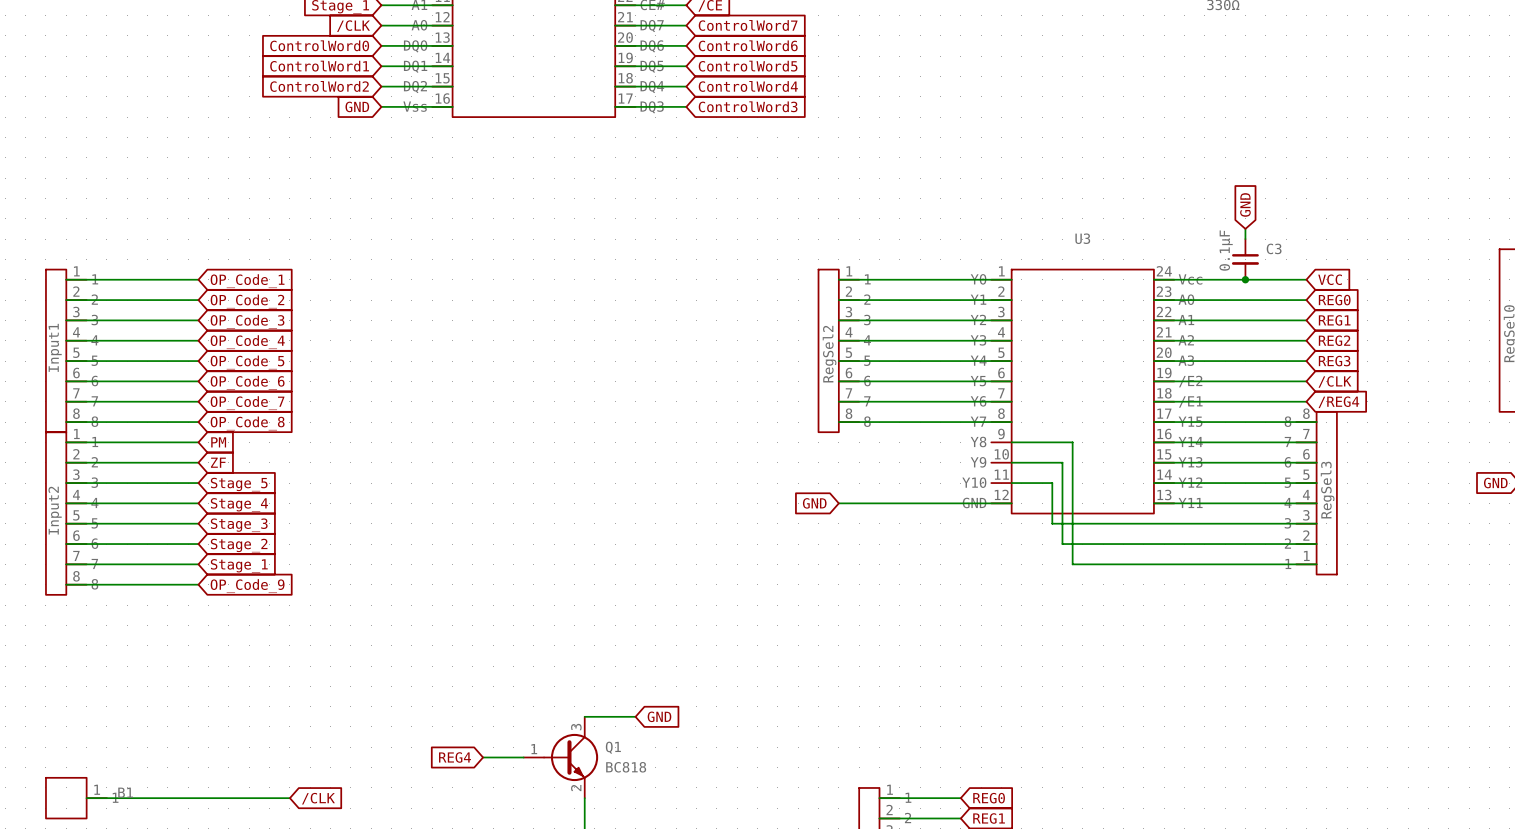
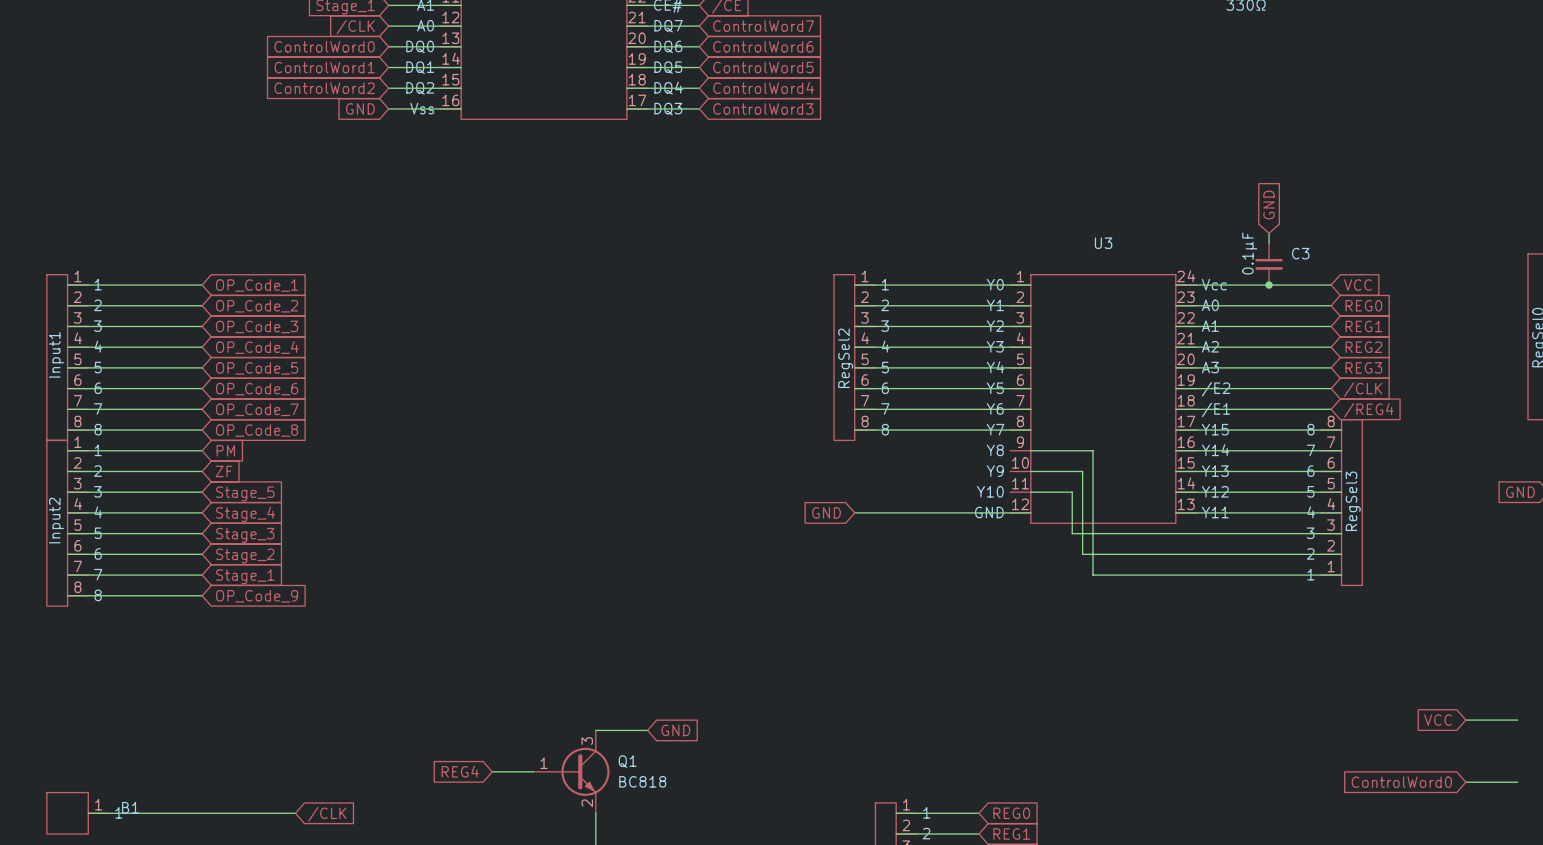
global label: none -> VCC (1438, 720)
wire: none -> (1465, 720) (1517, 720)
global label: none -> ControlWord0 (1401, 782)
wire: none -> (1465, 782) (1517, 782)

